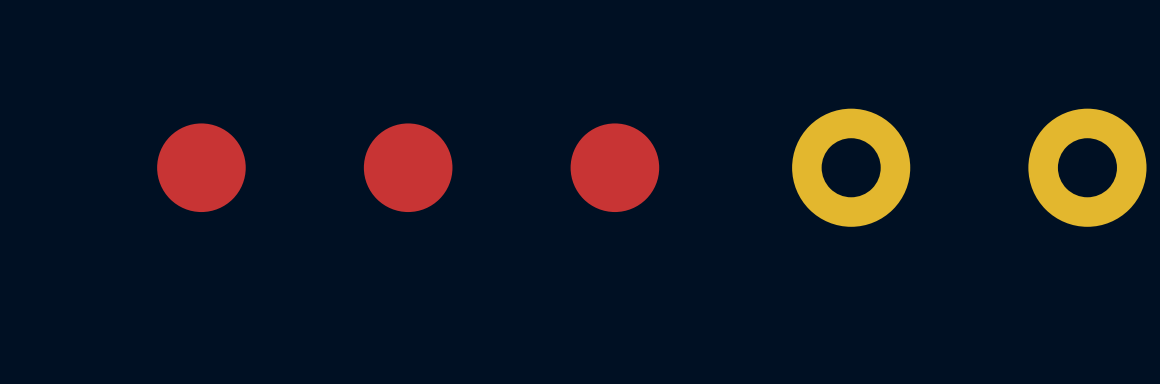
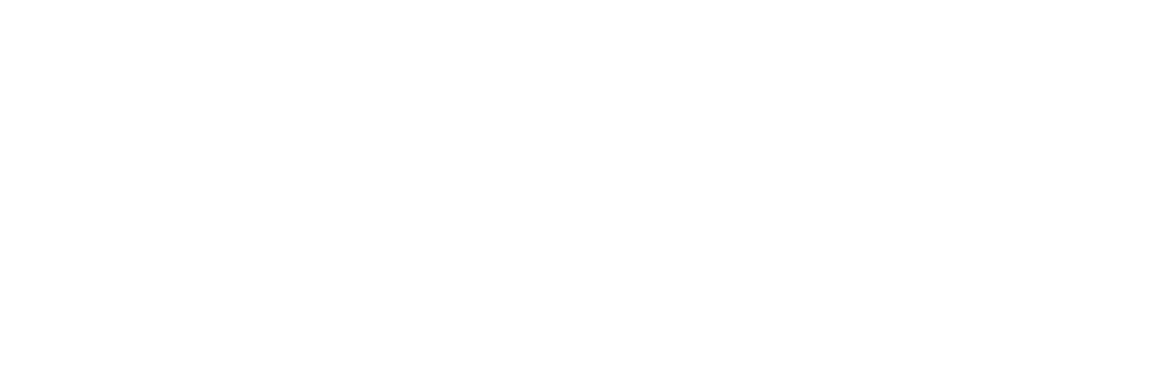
part: (201, 167) -> none
part: (408, 167) -> none
part: (614, 167) -> none
part: (851, 167) -> none
part: (1087, 167) -> none

